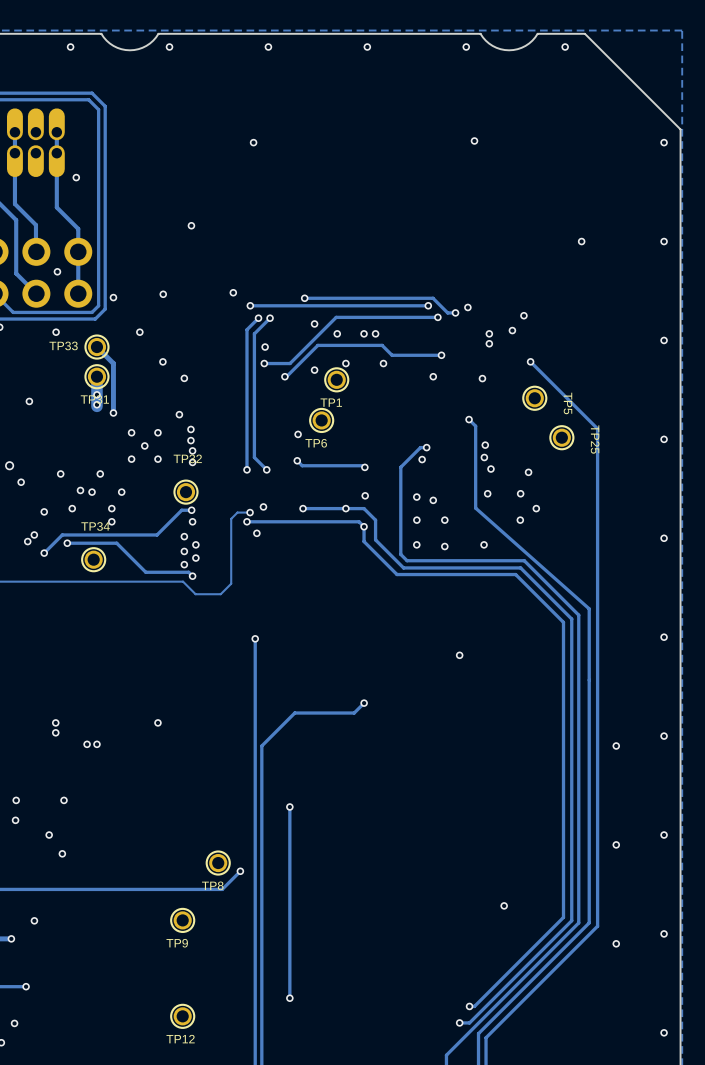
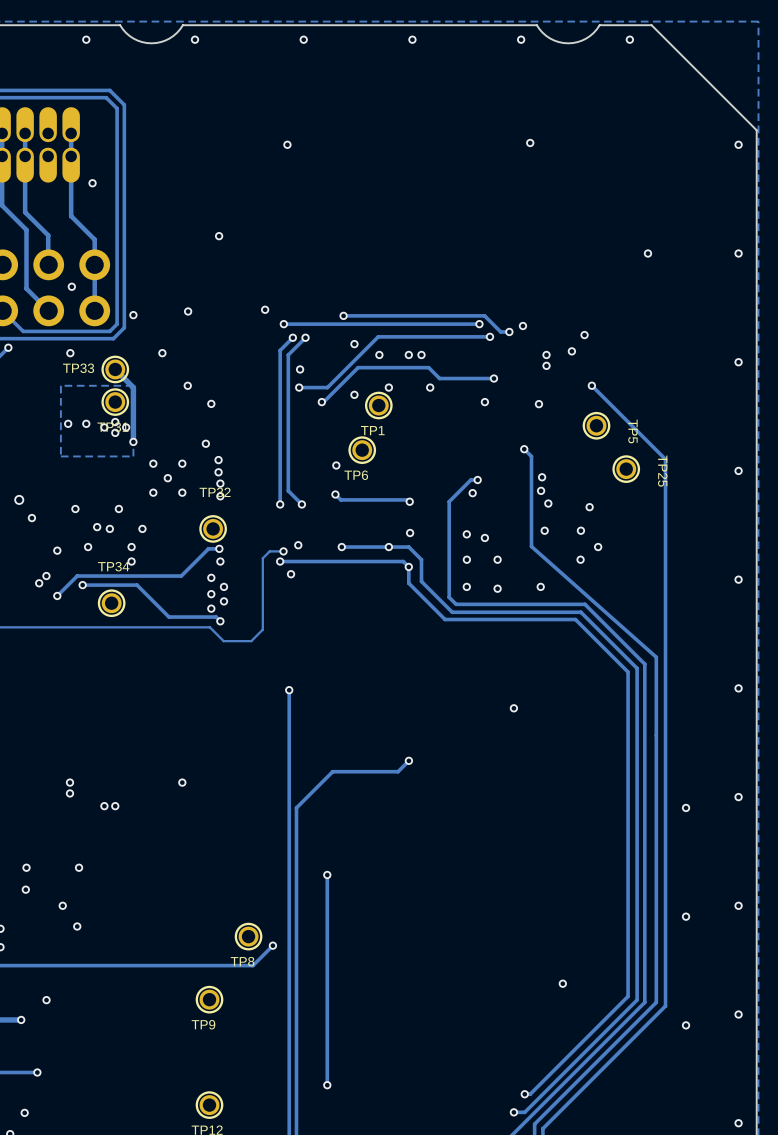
zone outline: none -> (133, 385) (60, 385) (60, 456) (133, 456) (133, 385)
track: (96, 376) (96, 406) -> none
via: none -> (68, 423)
via: none -> (86, 423)
via: none -> (104, 427)
via: none -> (126, 427)
via: (29, 401) -> none

